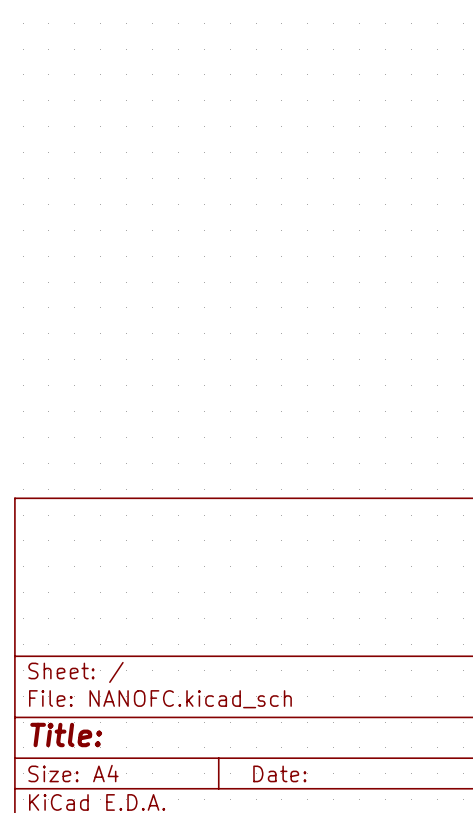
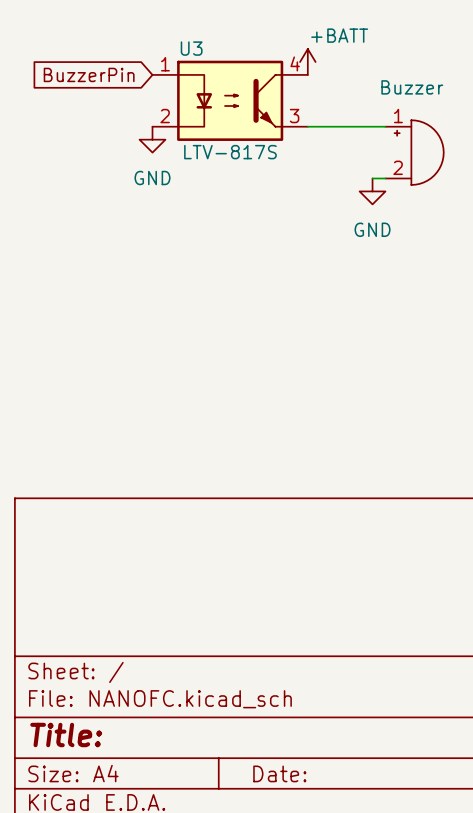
power symbol: none -> +BATT (307, 62)
global label: none -> BuzzerPin (89, 74)
U3: none -> LTV-817S (230, 100)
wire: none -> (307, 126) (385, 126)
power symbol: none -> GND (152, 139)
part: none -> Buzzer (414, 152)
wire: none -> (372, 178) (385, 178)
power symbol: none -> GND (372, 191)

